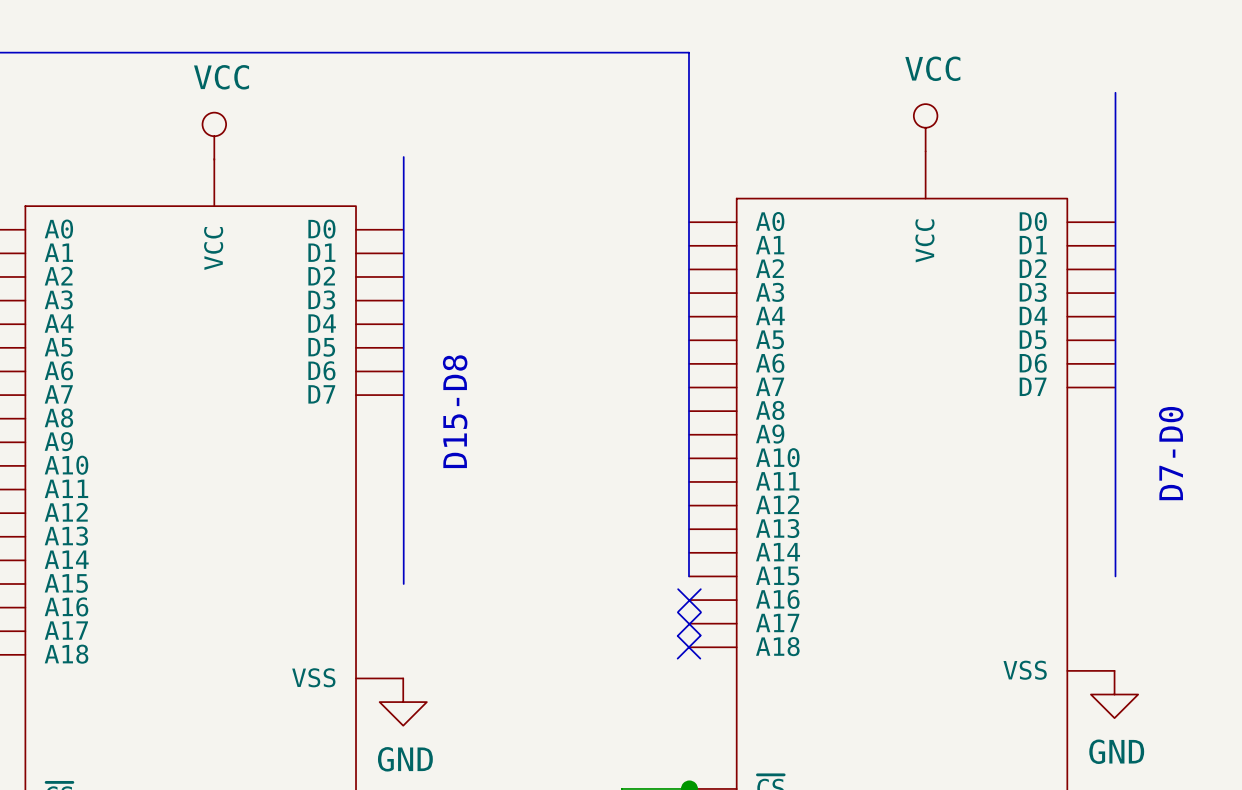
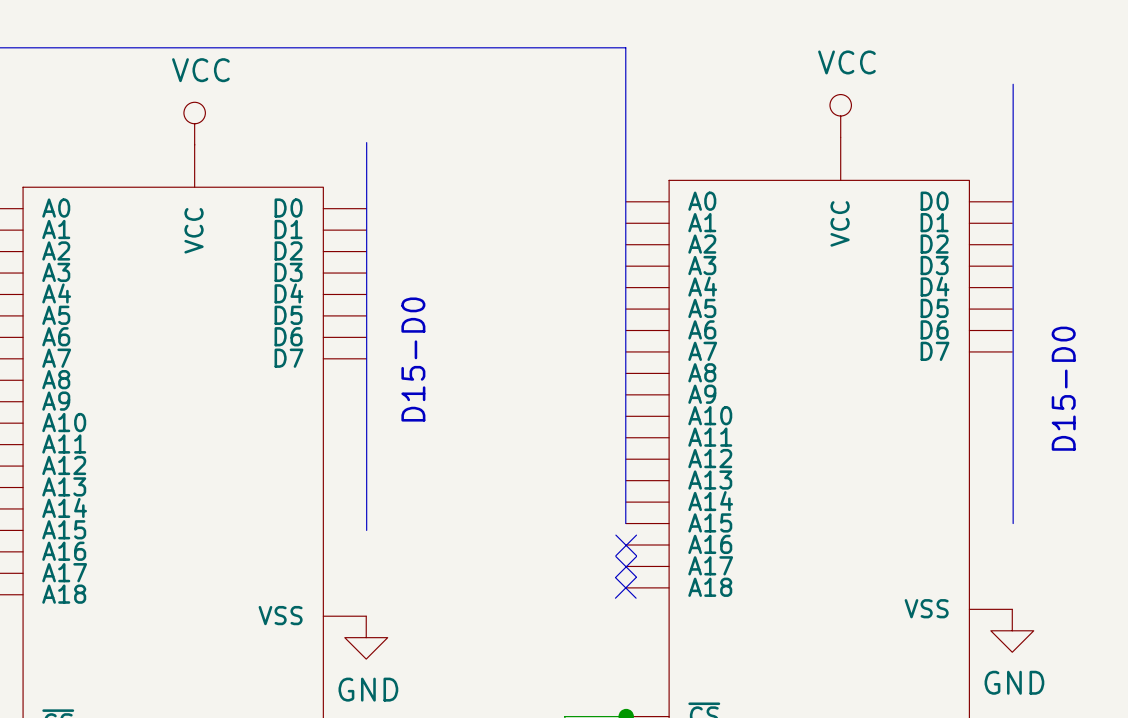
text: D15-D8 (455, 411) -> D15-D0 (413, 359)
text: D7-D0 (1171, 453) -> D15-D0 (1063, 388)

